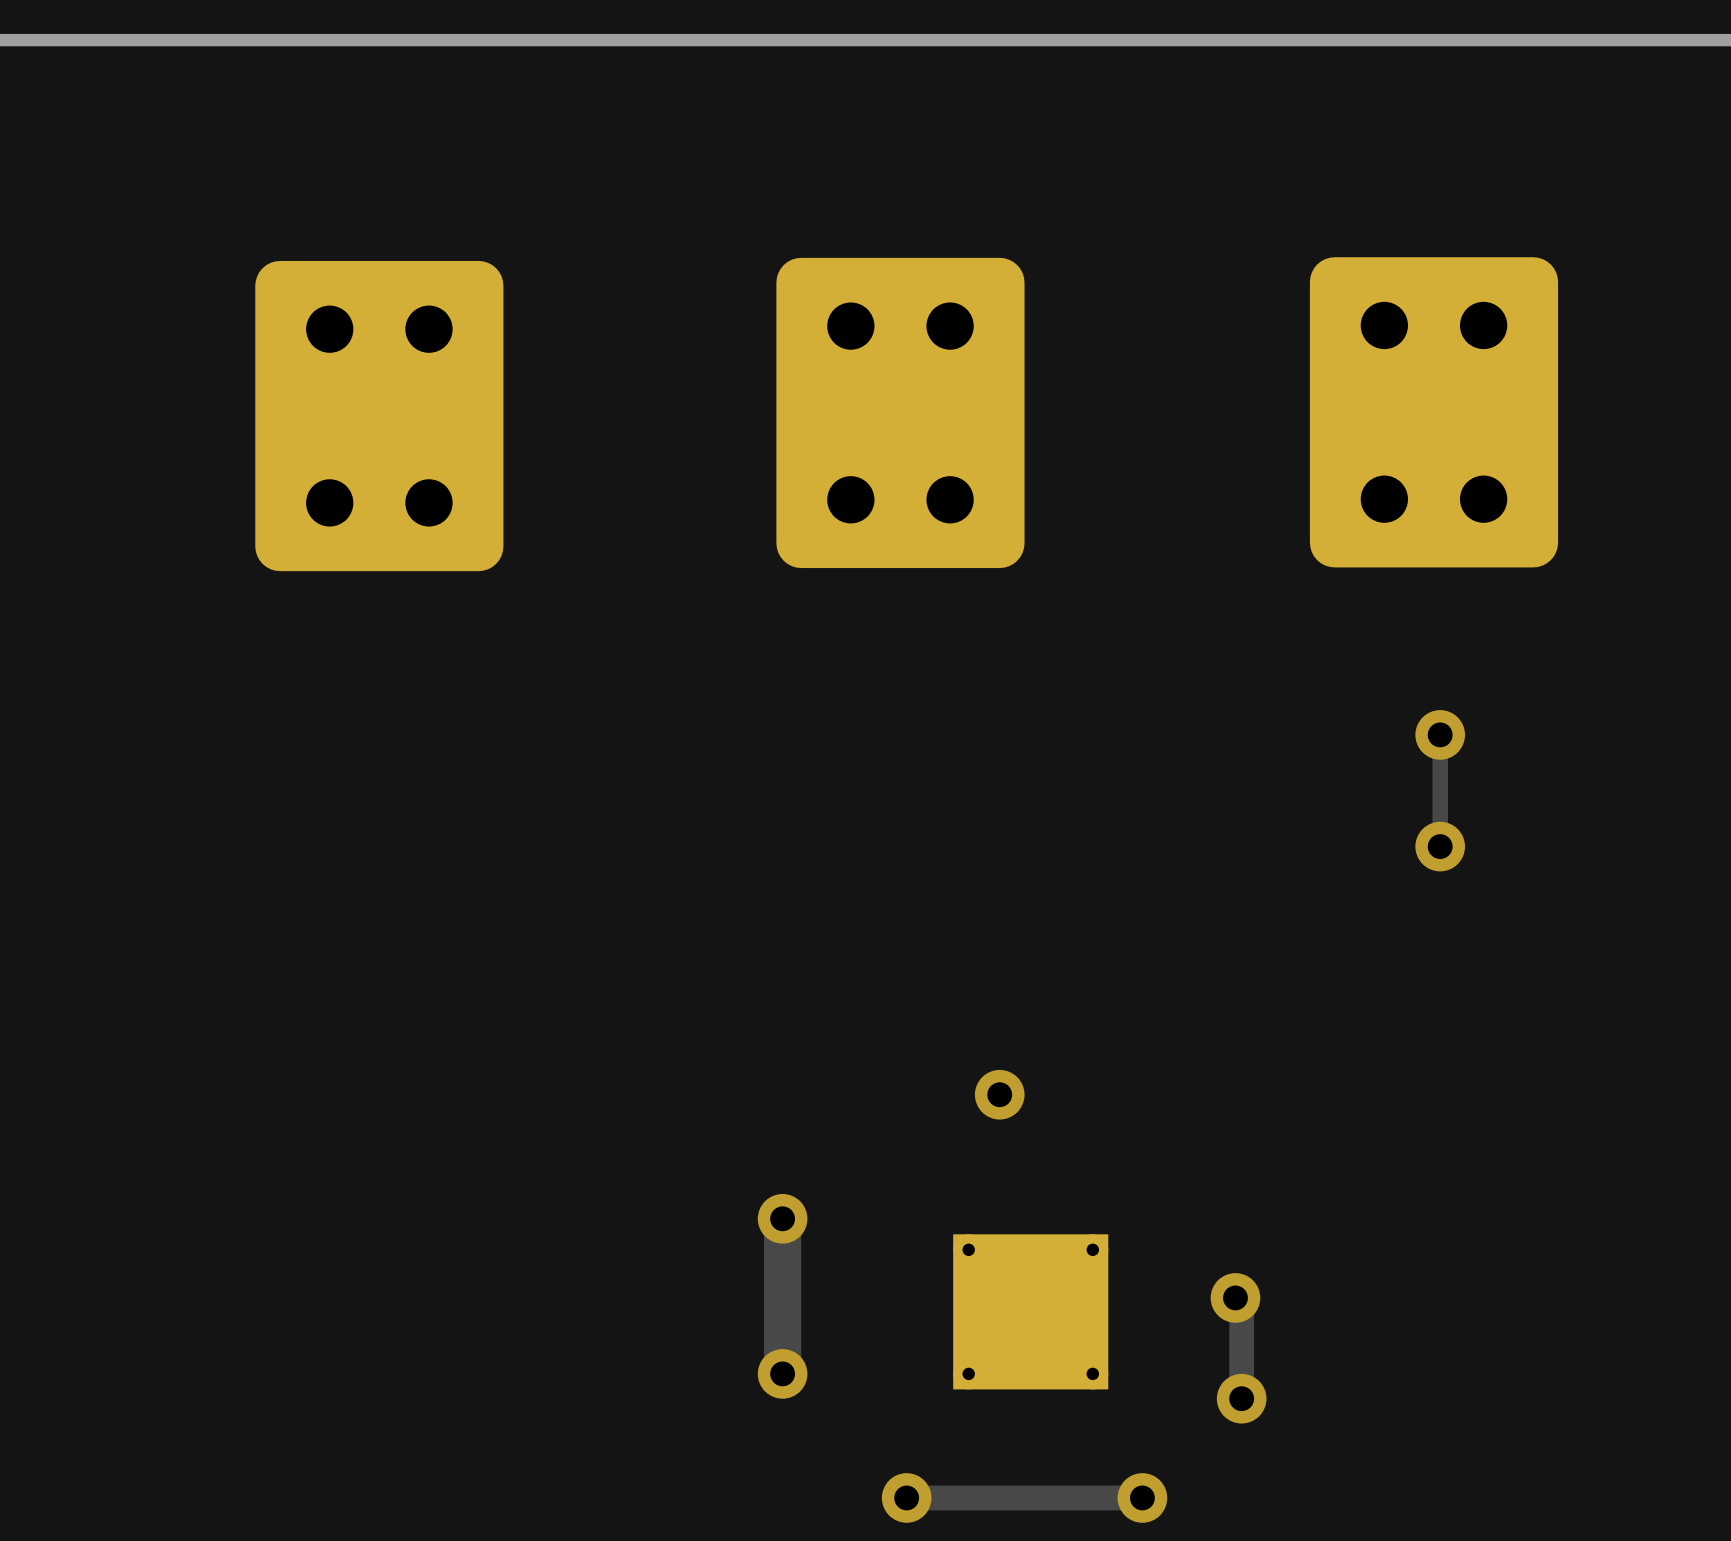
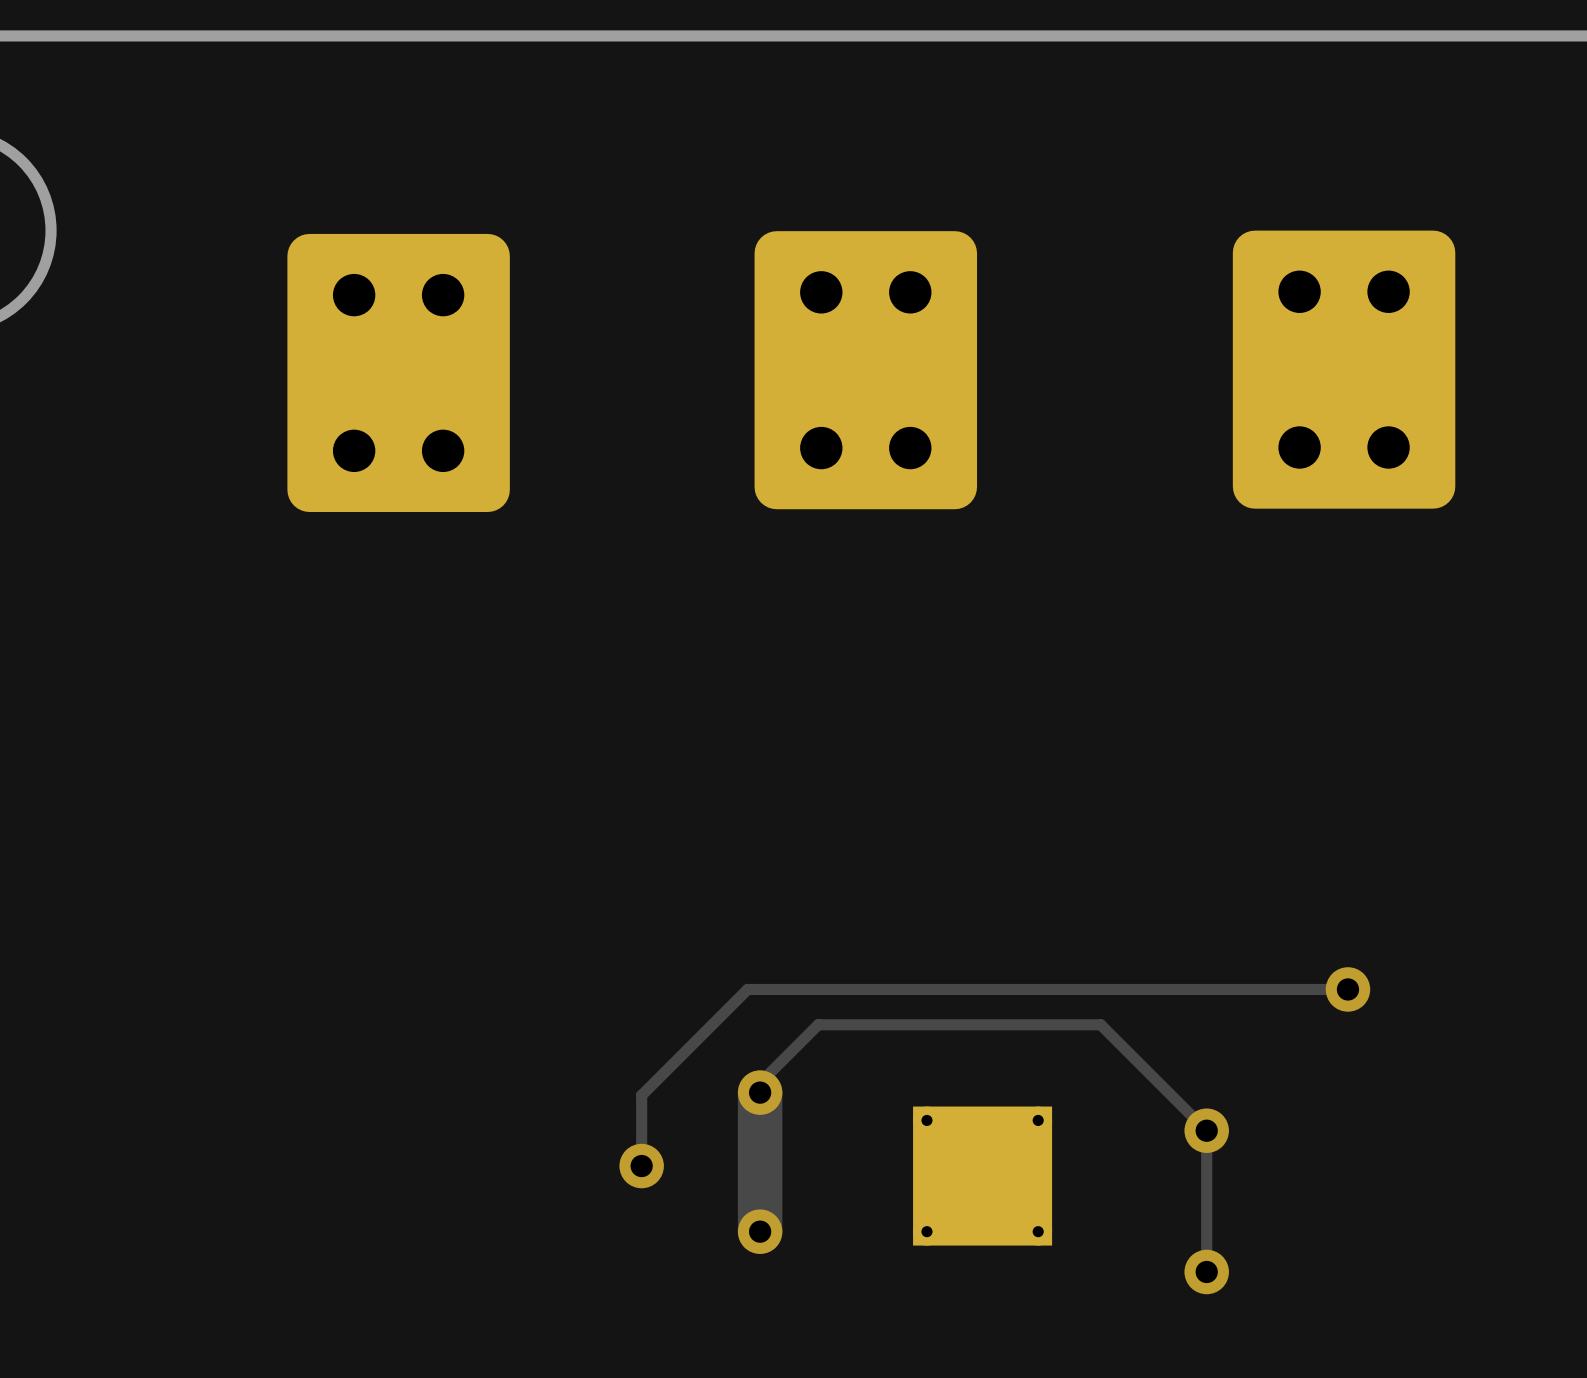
track: (1440, 734) (1440, 846) -> none
via: (1440, 734) -> none
via: (1440, 846) -> none
via: (999, 1094) -> none
track: none -> (1347, 989) (747, 989) (641, 1095) (641, 1166)
via: none -> (1347, 989)
track: none -> (760, 1092) (760, 1082) (818, 1024) (1100, 1024) (1206, 1130) (1206, 1271)
track width: thin (782, 1218) (782, 1373) -> thick (760, 1092) (760, 1231)
track: (1235, 1297) (1241, 1305) (1241, 1398) -> none
via position: (1235, 1297) -> (1206, 1130)
via: none -> (641, 1166)
via position: (1241, 1398) -> (1206, 1271)
via: (906, 1497) -> none
track: (1142, 1497) (906, 1497) -> none
via: (1142, 1497) -> none

